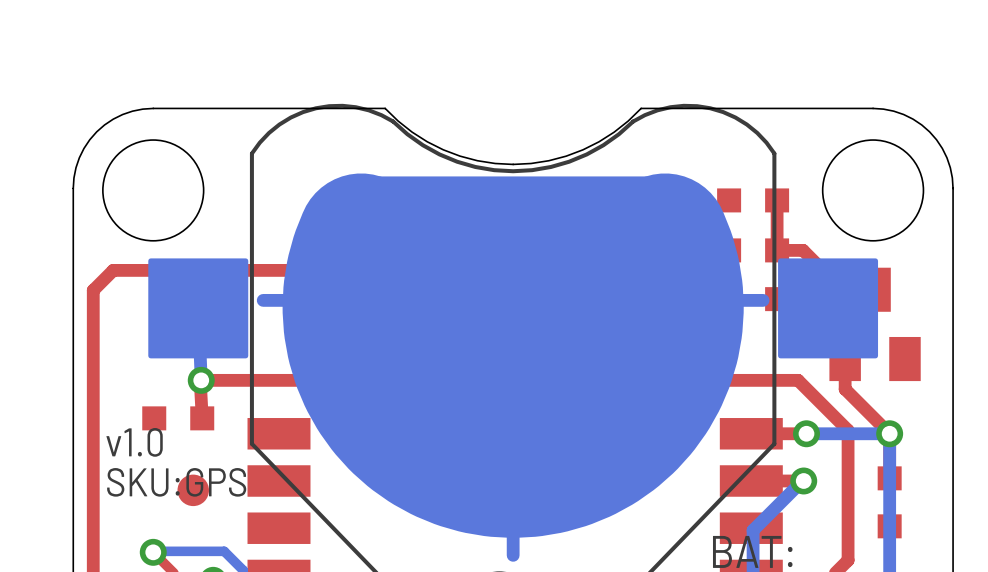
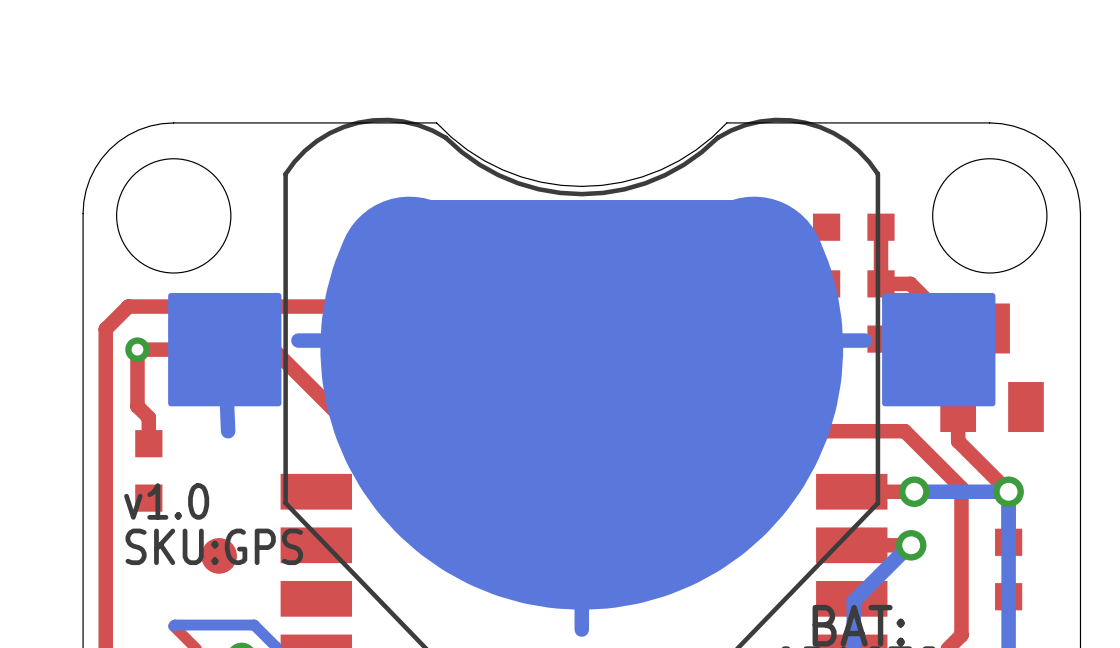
via: none -> (137, 349)
via: (201, 380) -> none
top track: (313, 380) (200, 380) (202, 418) -> (355, 431) (273, 349) (137, 349) (137, 406) (148, 417) (148, 443)
part rotation: 0° (178, 418) -> 90° clockwise (148, 470)
part position: (178, 418) -> (148, 470)
via: (153, 552) -> none

